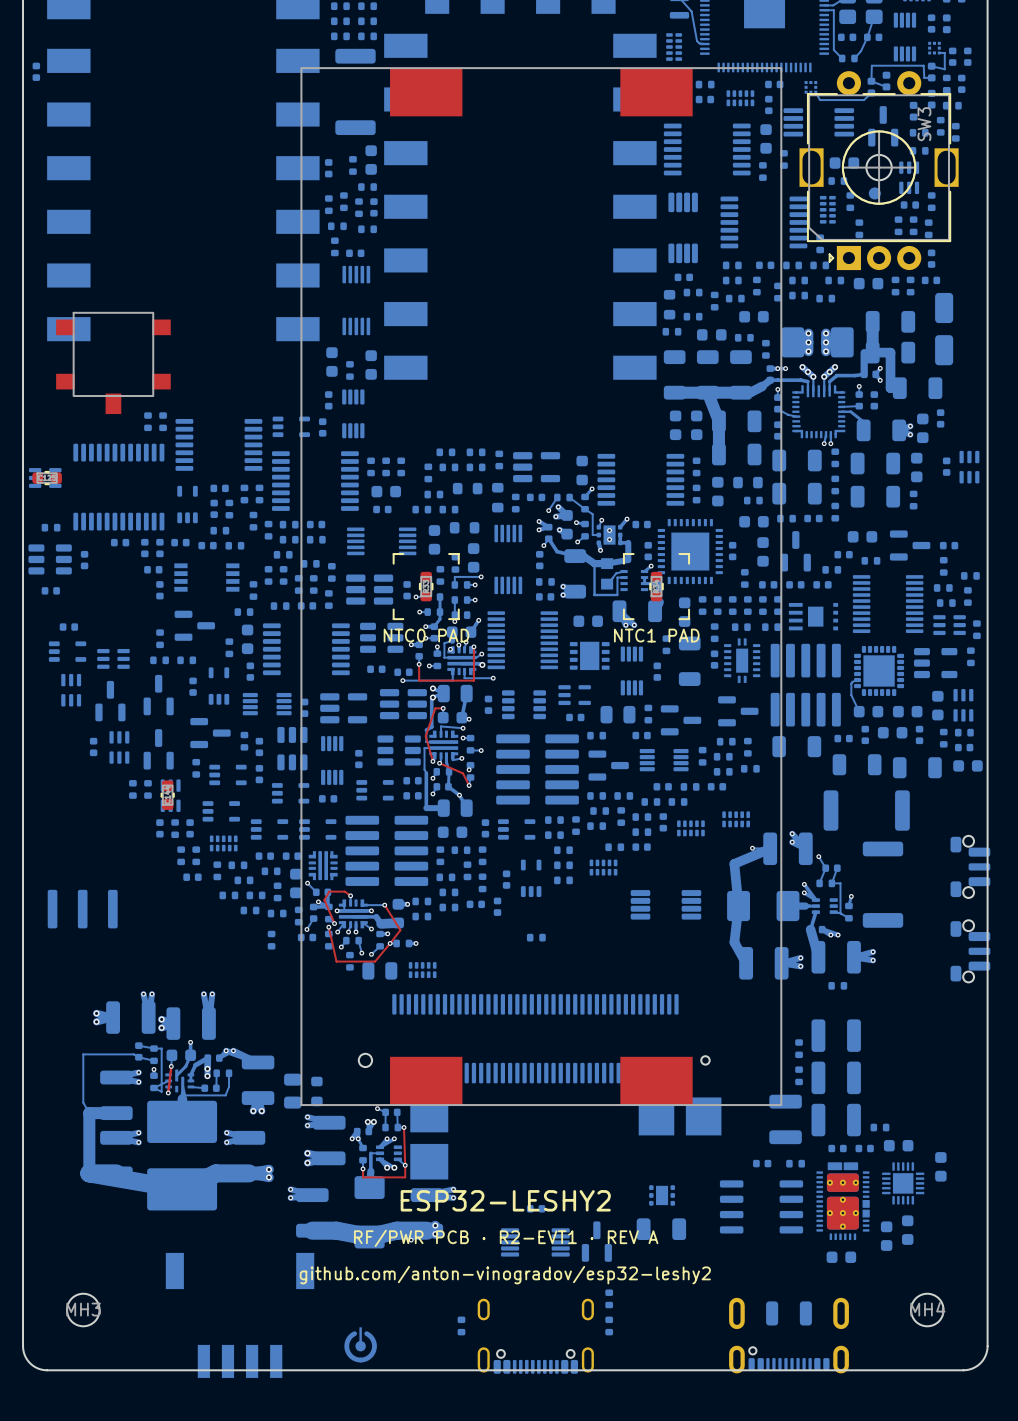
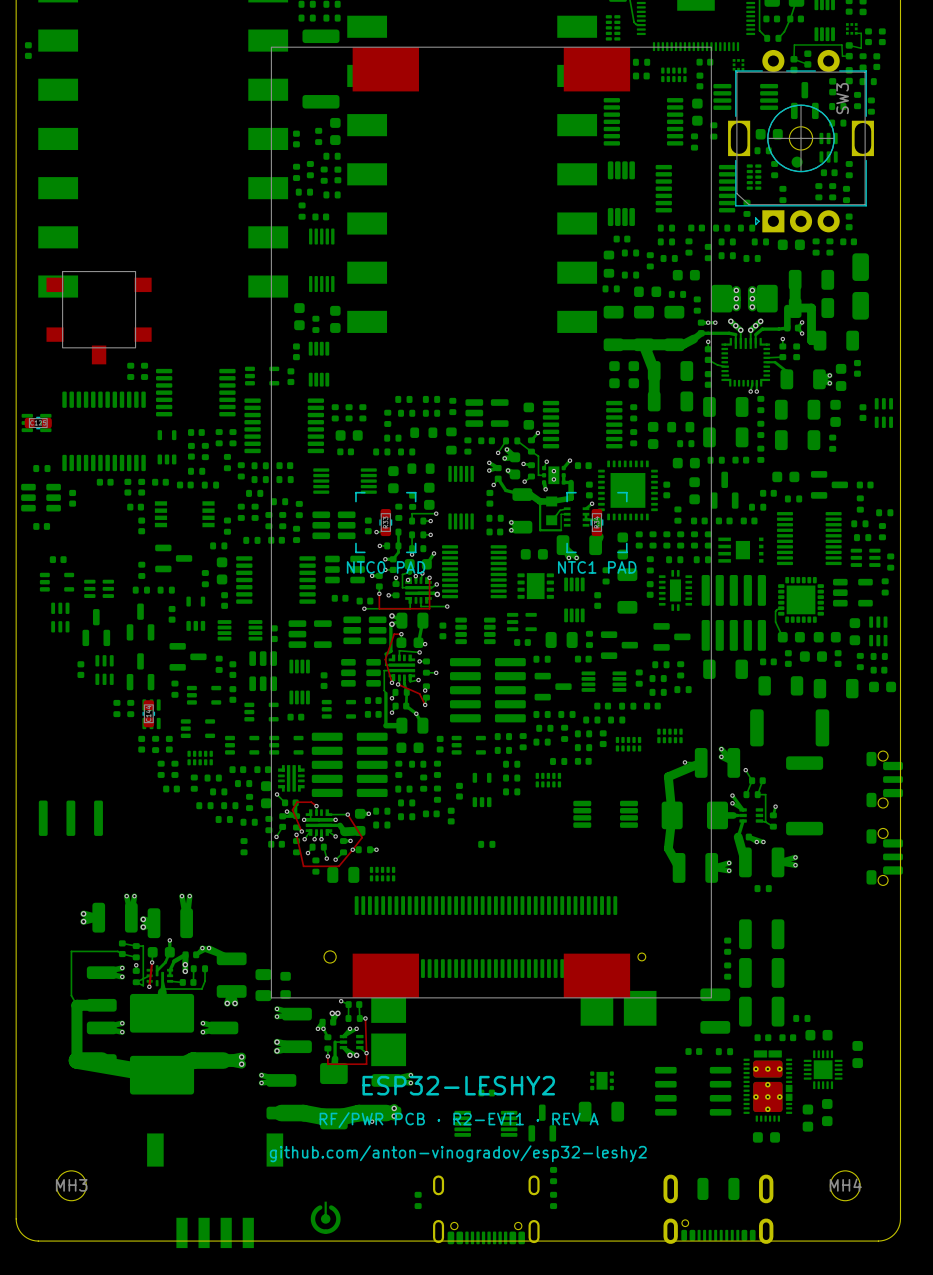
bottom track: (815, 92) (819, 100) (864, 100) (871, 92) -> none

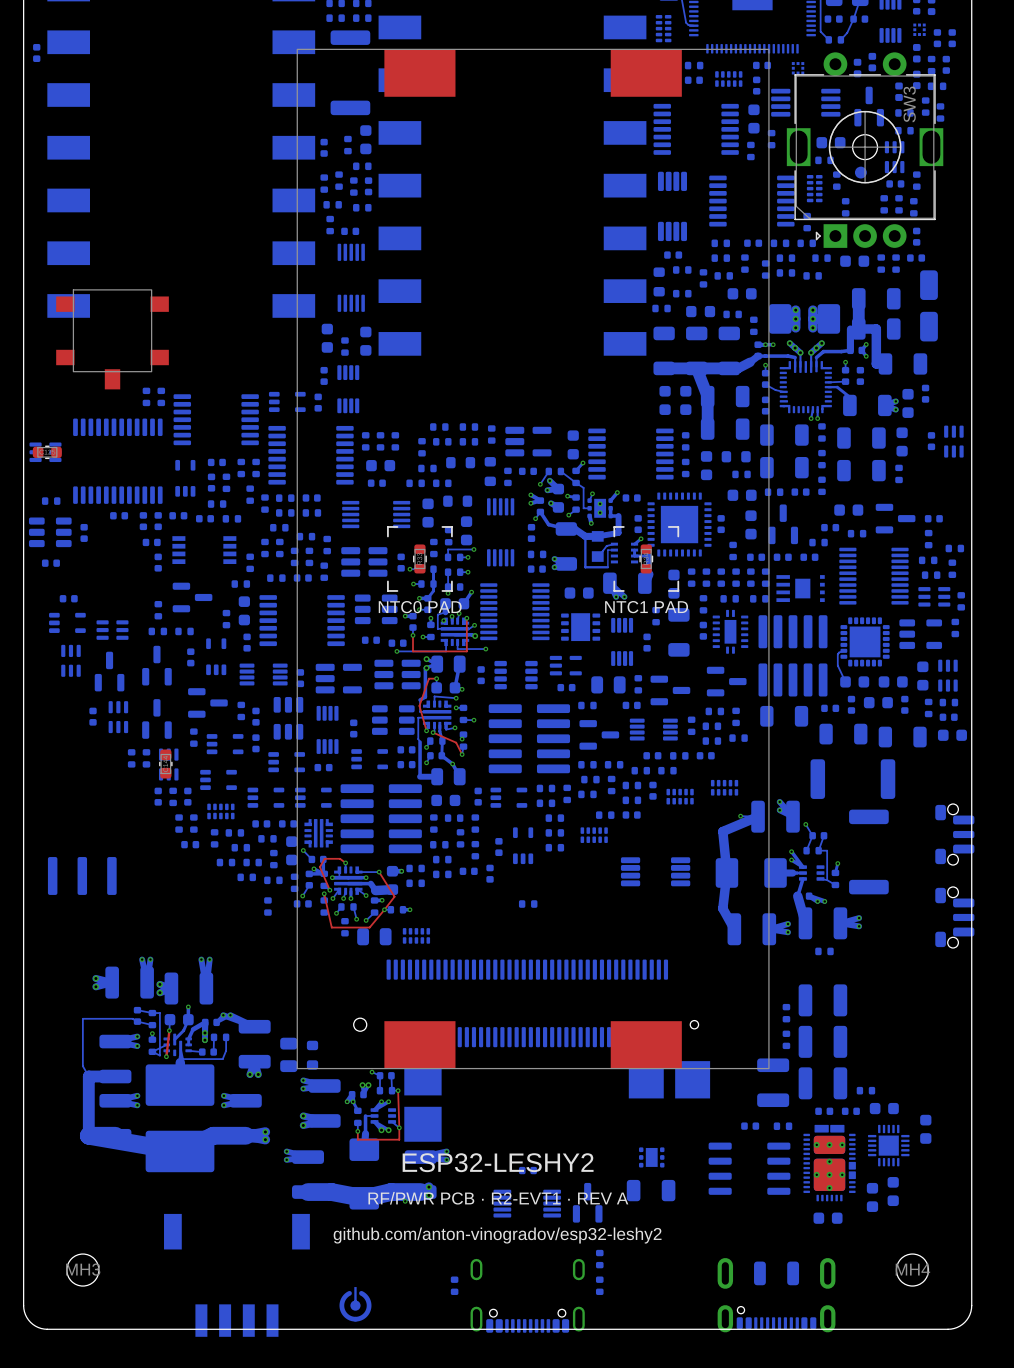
bottom track: (856, 33) (861, 33) (861, 48) (849, 45) -> none
bottom track: (849, 56) (842, 56) (841, 44) (794, 44) (793, 59) (807, 64) -> none

